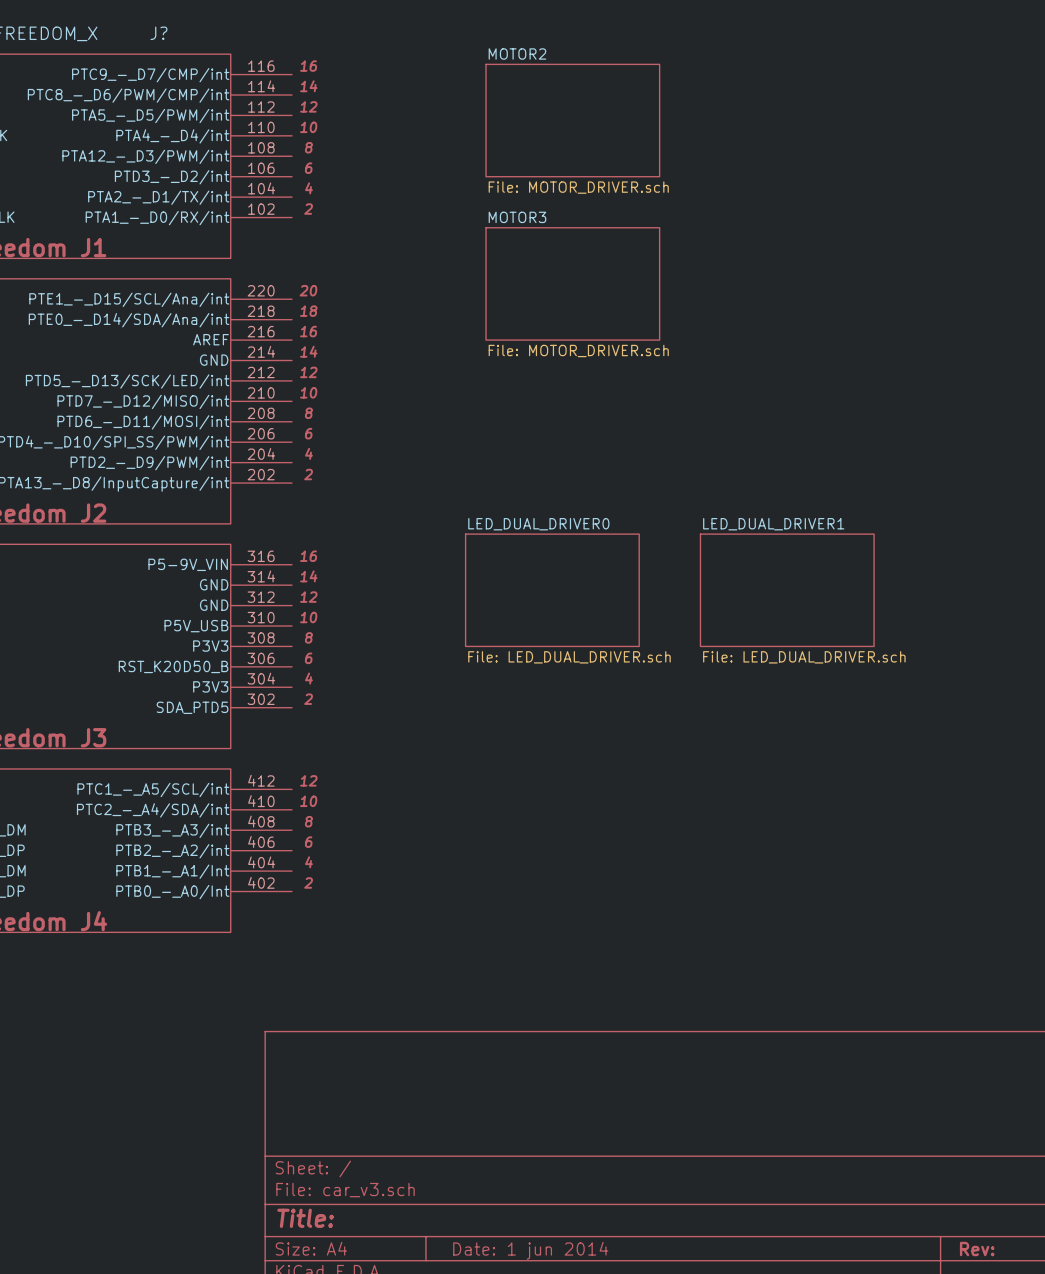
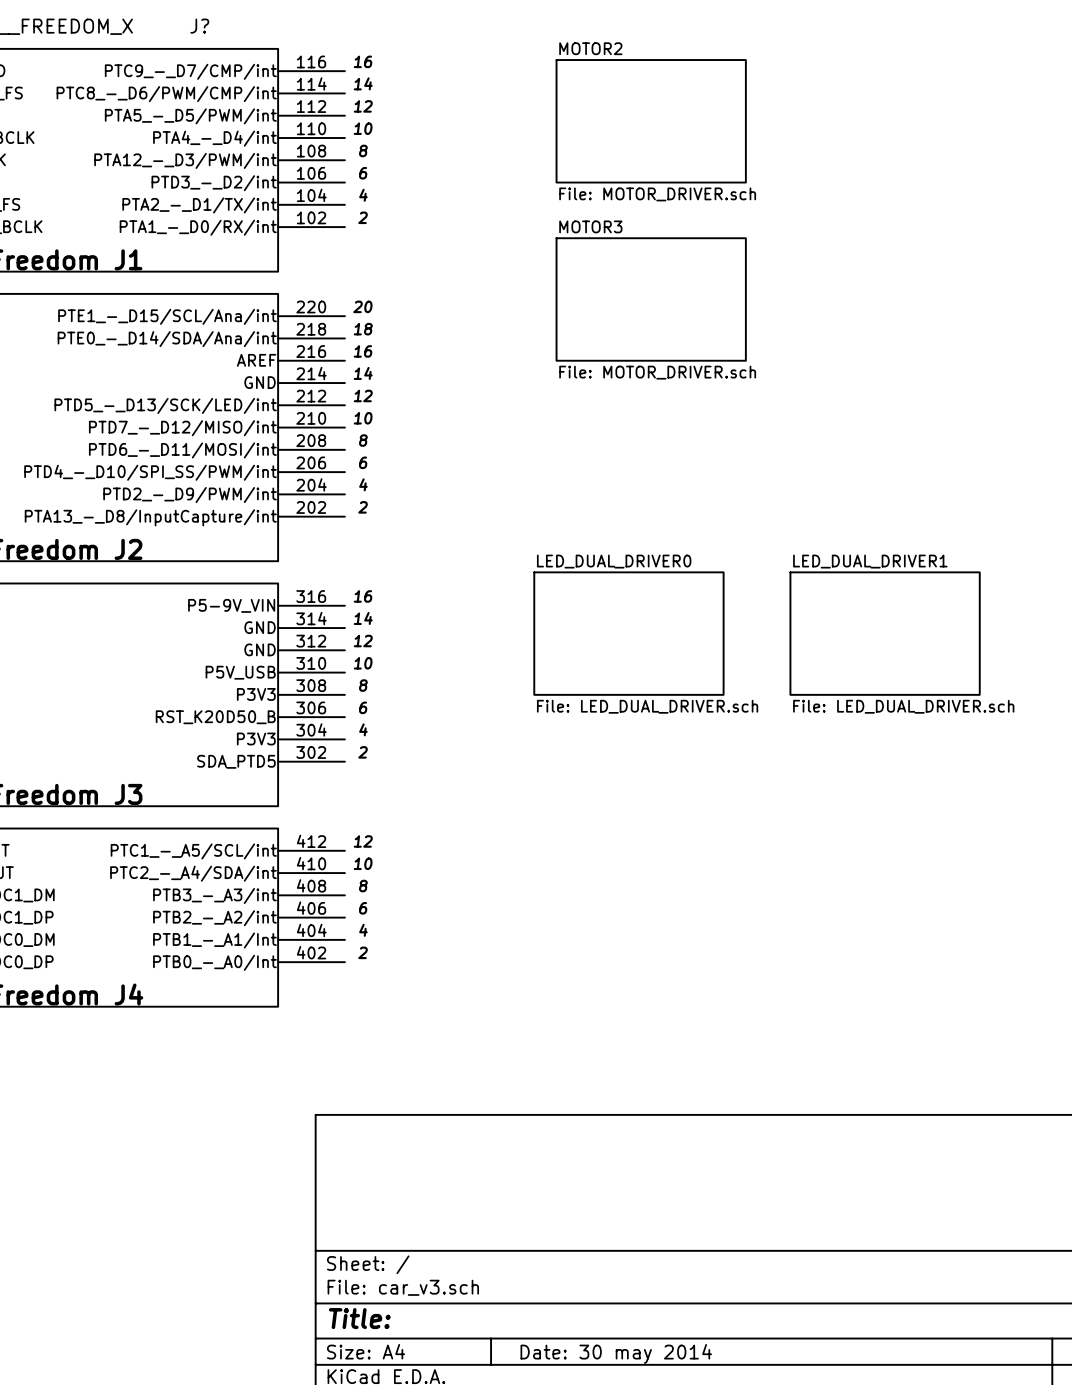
title block: Date: 1 jun 2014 (530, 1250) -> Date: 30 may 2014 (616, 1353)

